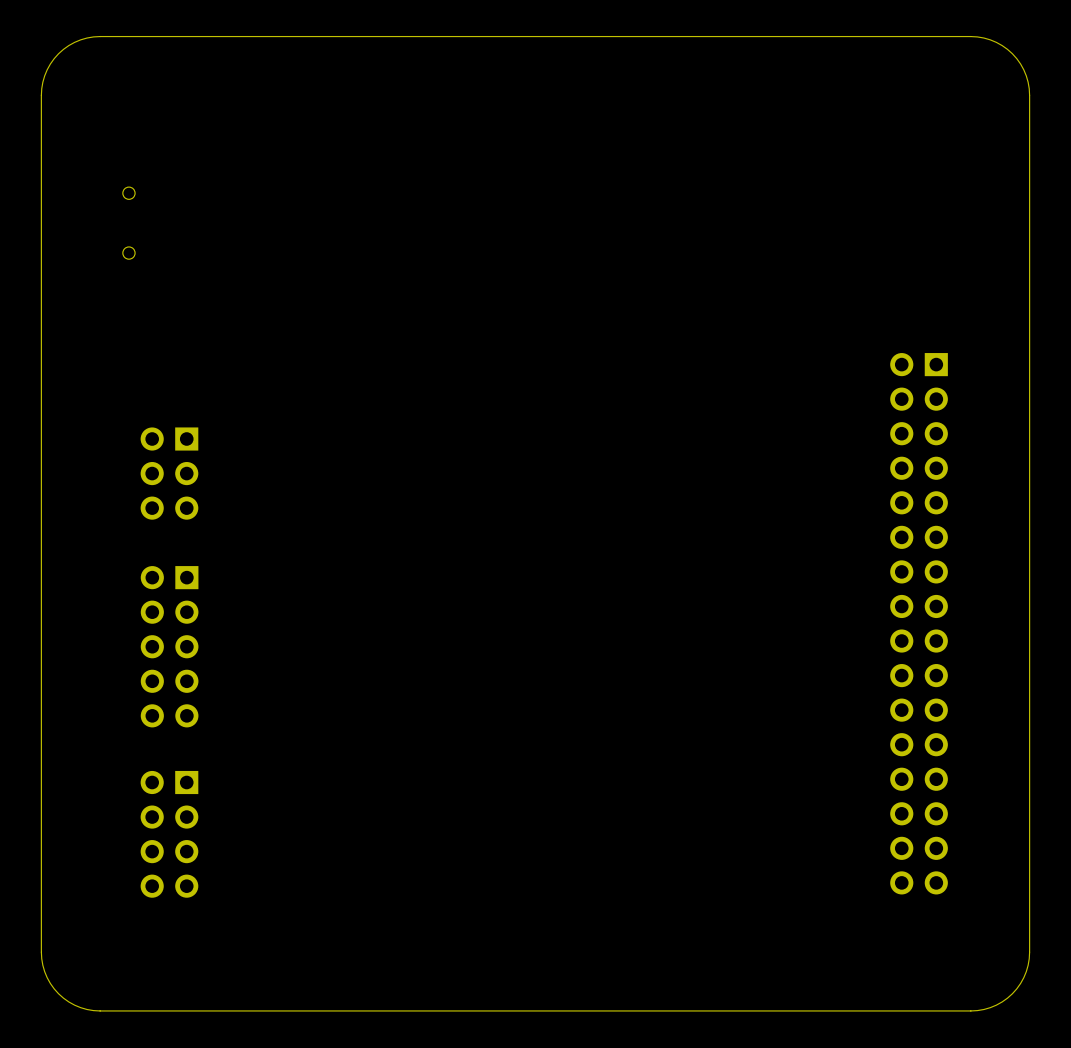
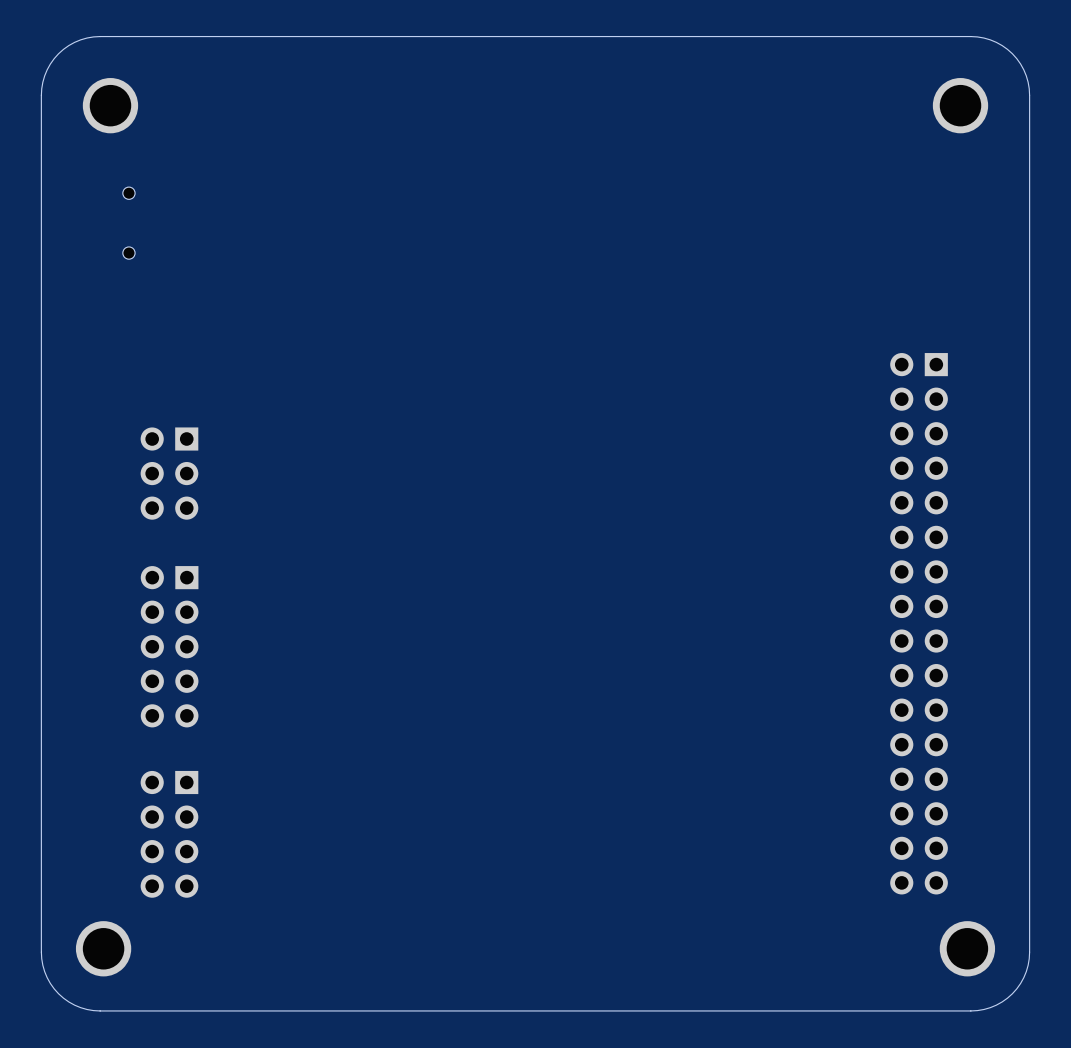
part: none -> (110, 105)
part: none -> (960, 105)
part: none -> (103, 948)
part: none -> (967, 948)

